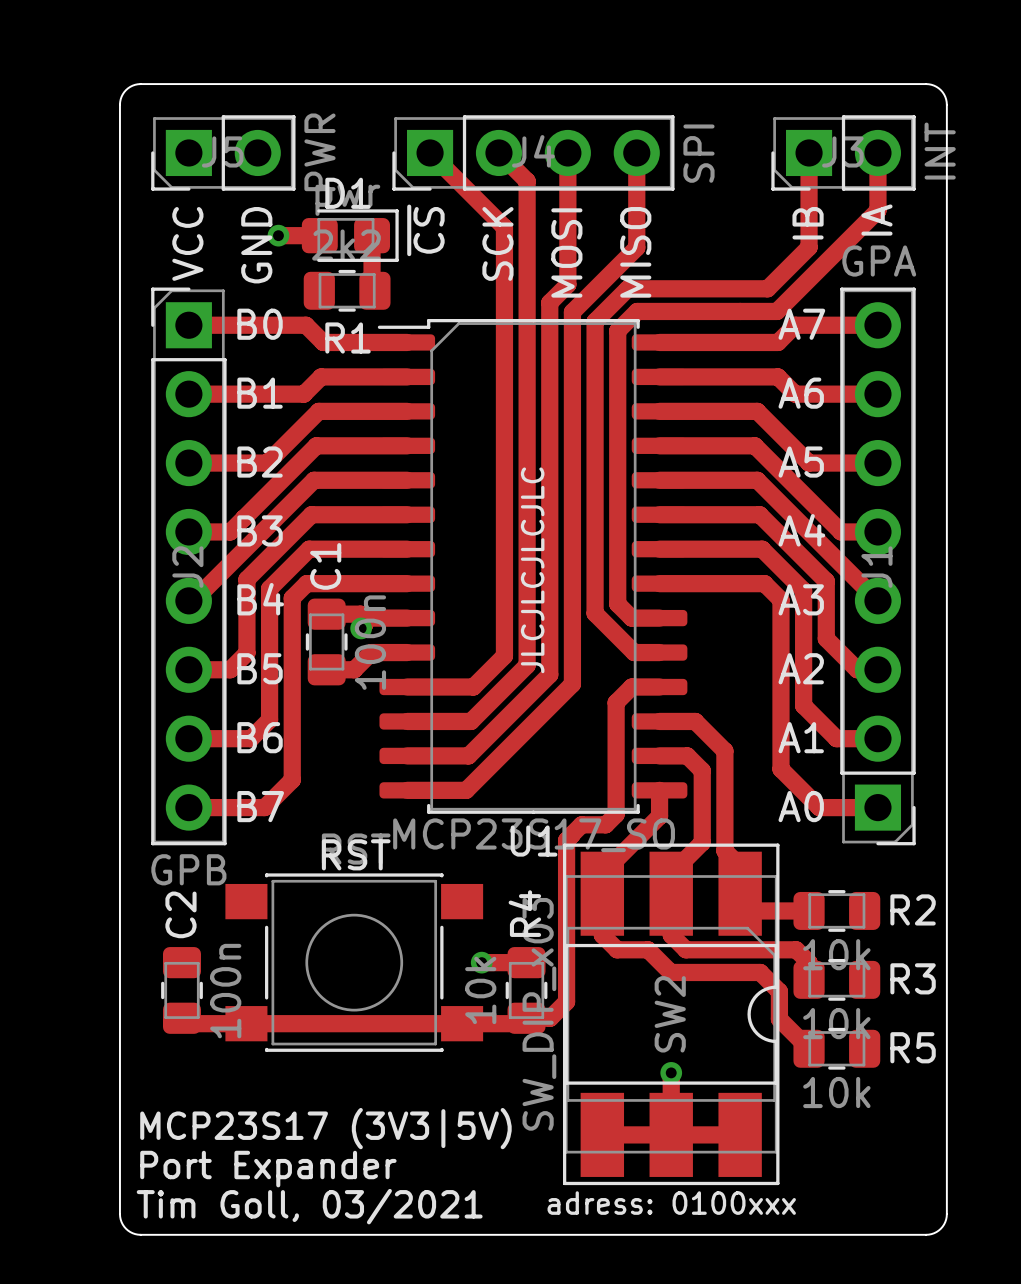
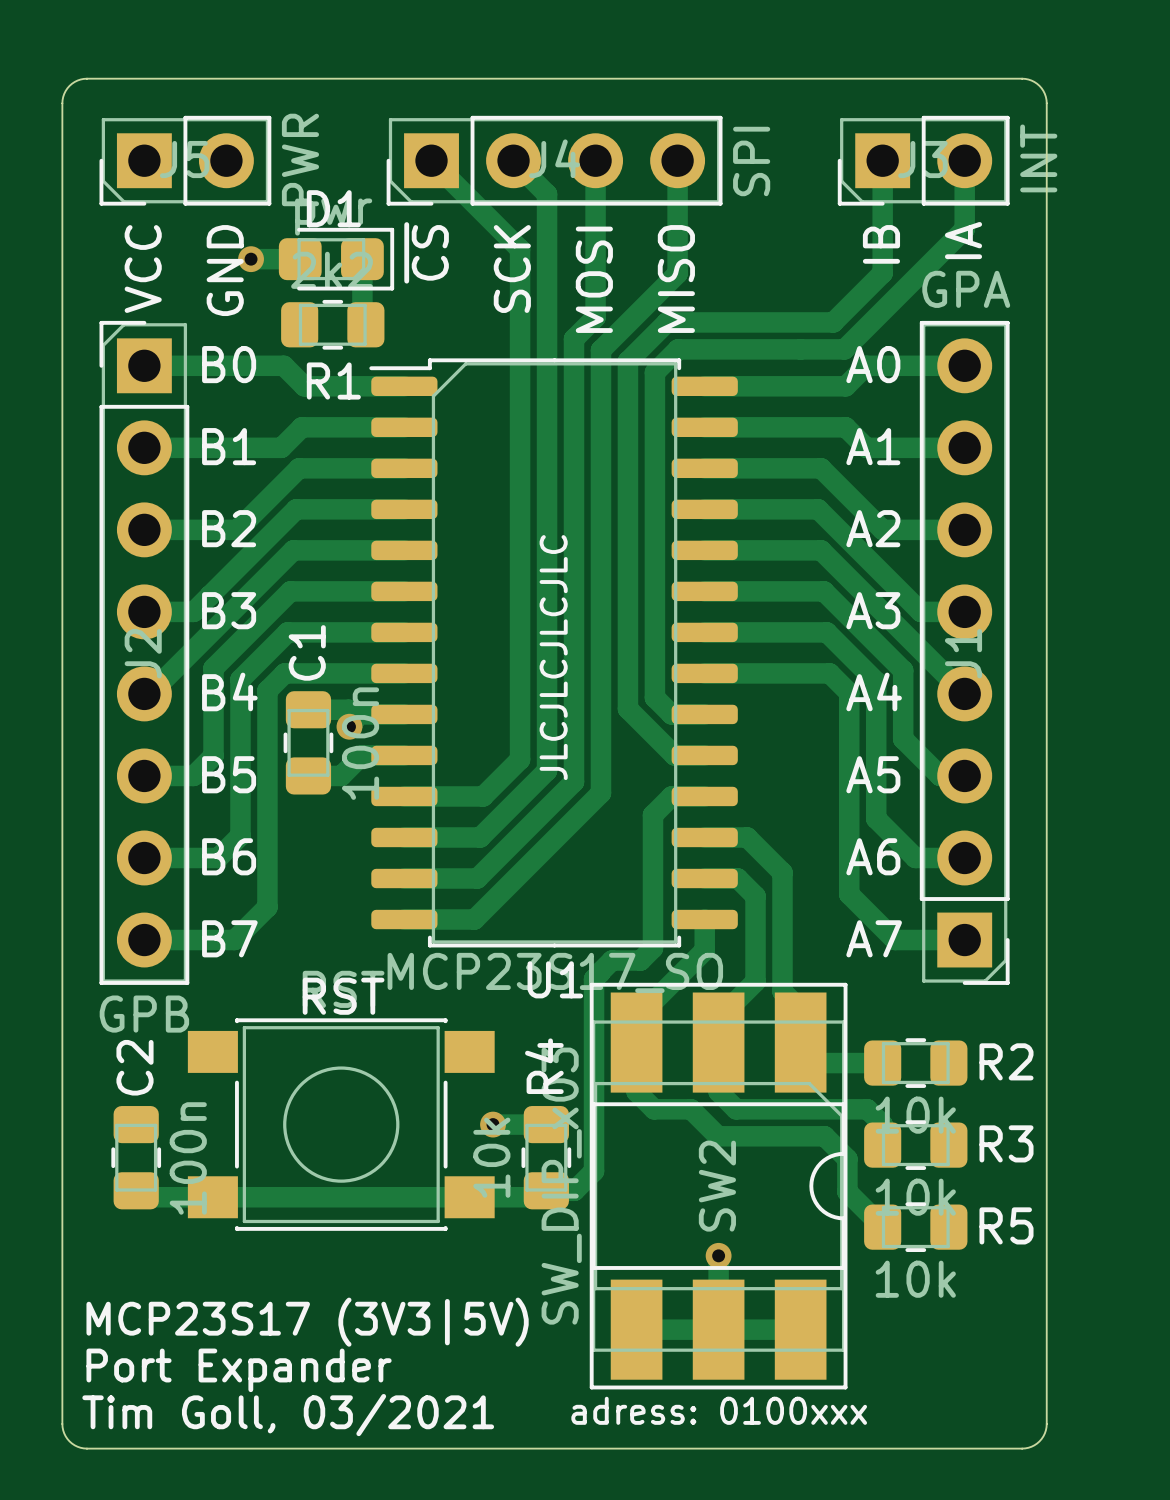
text: A7 (801, 324) -> A0 (873, 364)
text: A6 (801, 393) -> A1 (873, 446)
text: A5 (801, 462) -> A2 (873, 528)
text: A4 (801, 530) -> A3 (873, 610)
text: A3 (801, 599) -> A4 (874, 691)
text: A2 (801, 668) -> A5 (873, 774)
text: A1 (801, 737) -> A6 (873, 856)
text: A0 (801, 806) -> A7 (874, 938)

